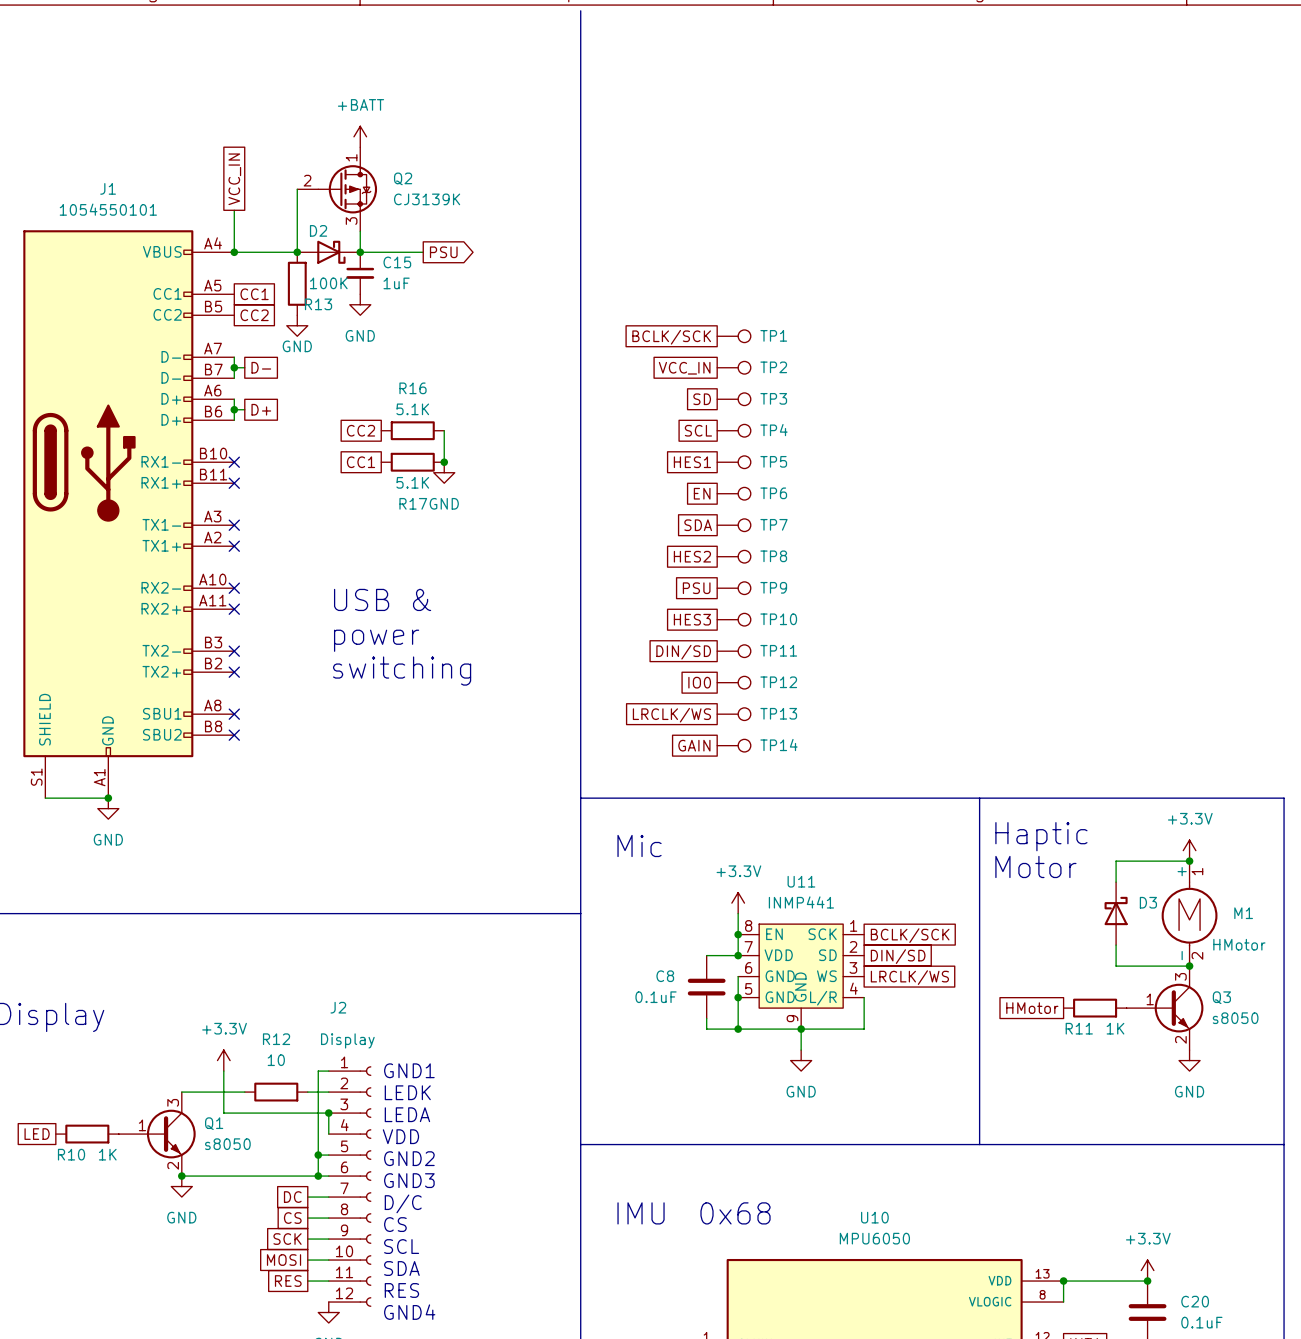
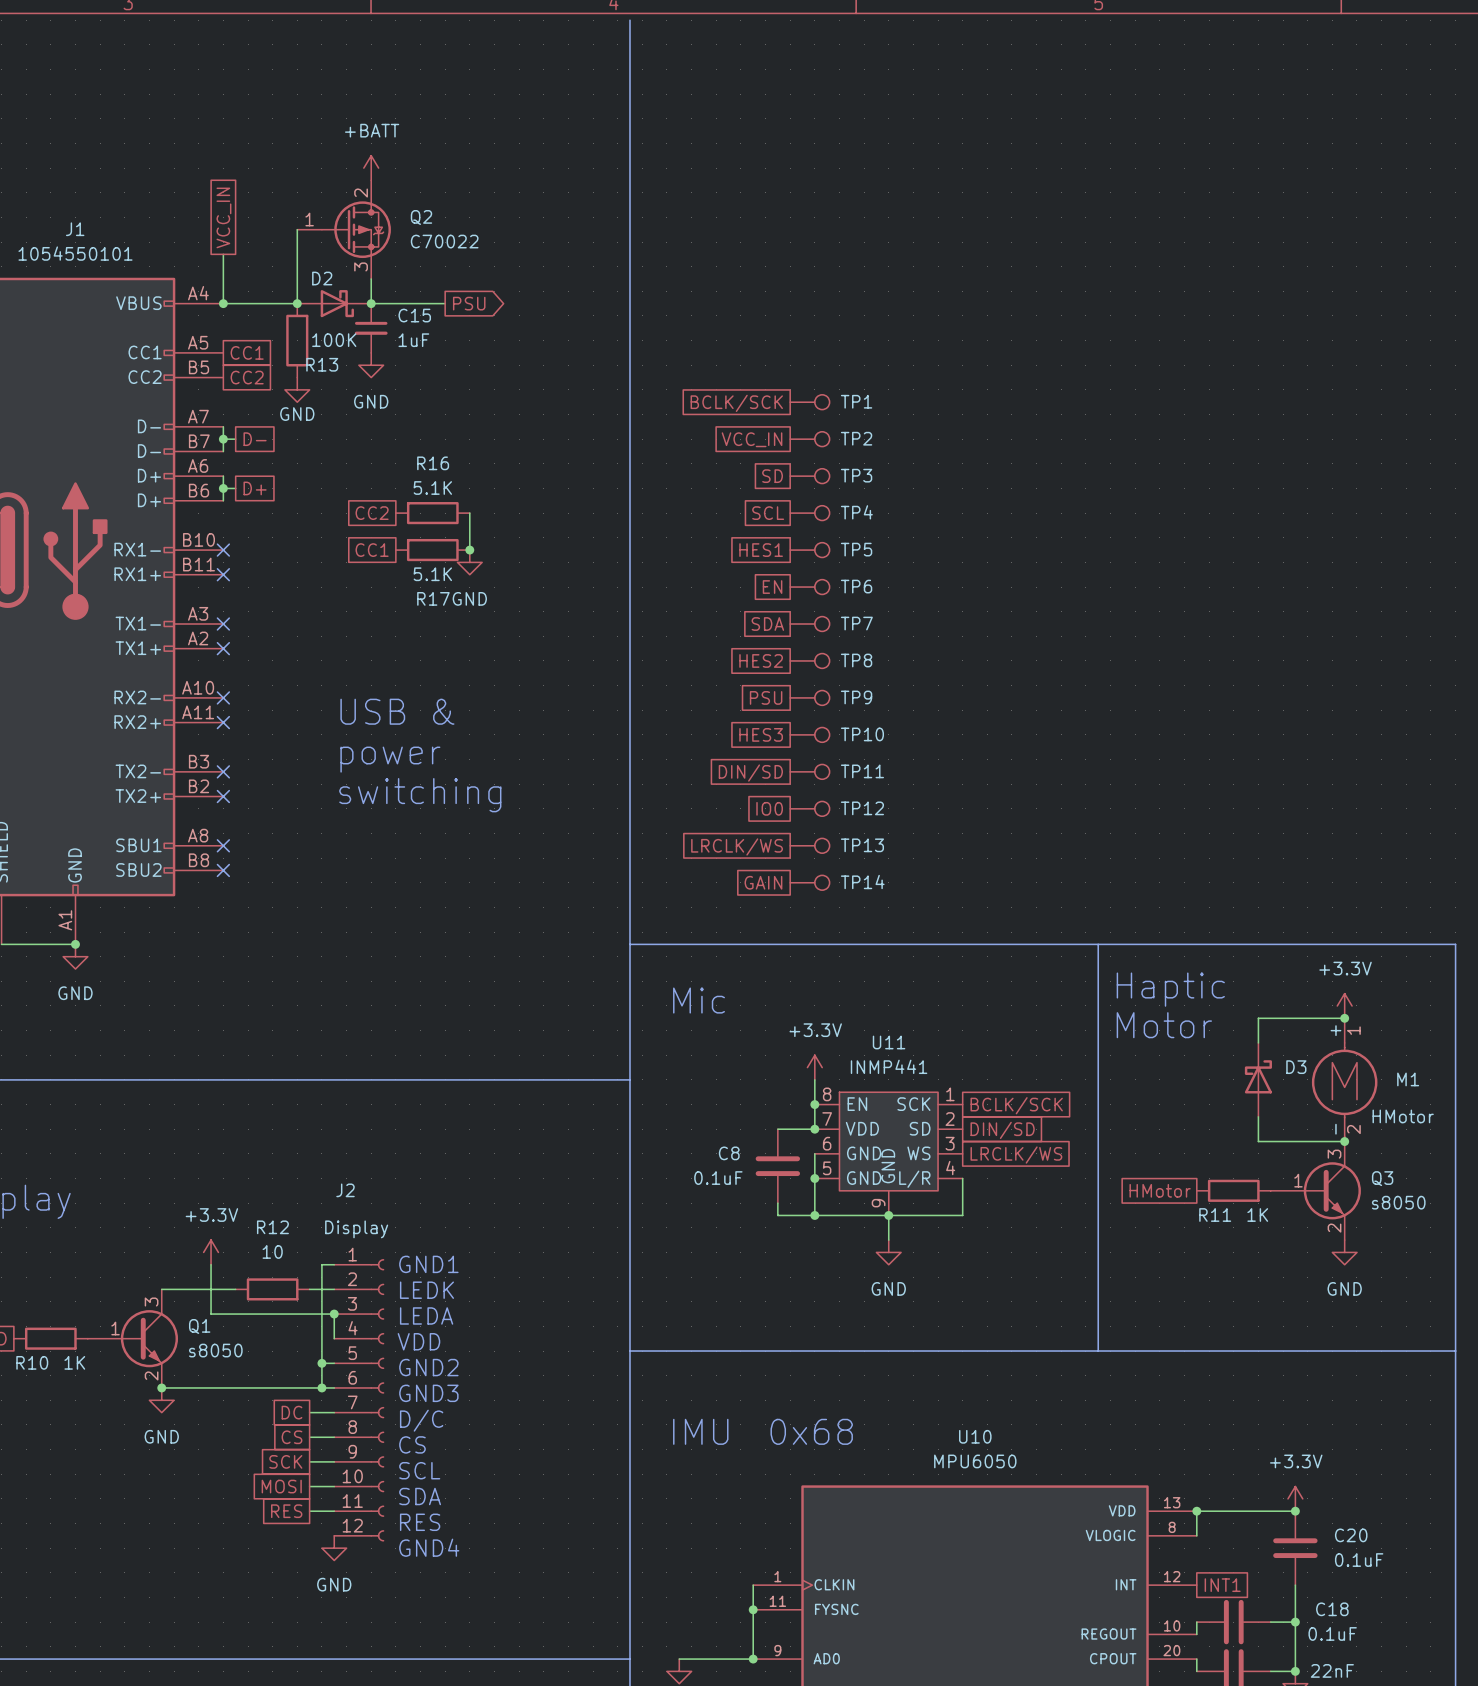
Q2 pin number: 1 (351, 157) -> 2 (361, 193)
Q2 pin number: 2 (307, 180) -> 1 (309, 219)
Q2 value: CJ3139K (427, 199) -> C70022 (444, 241)

